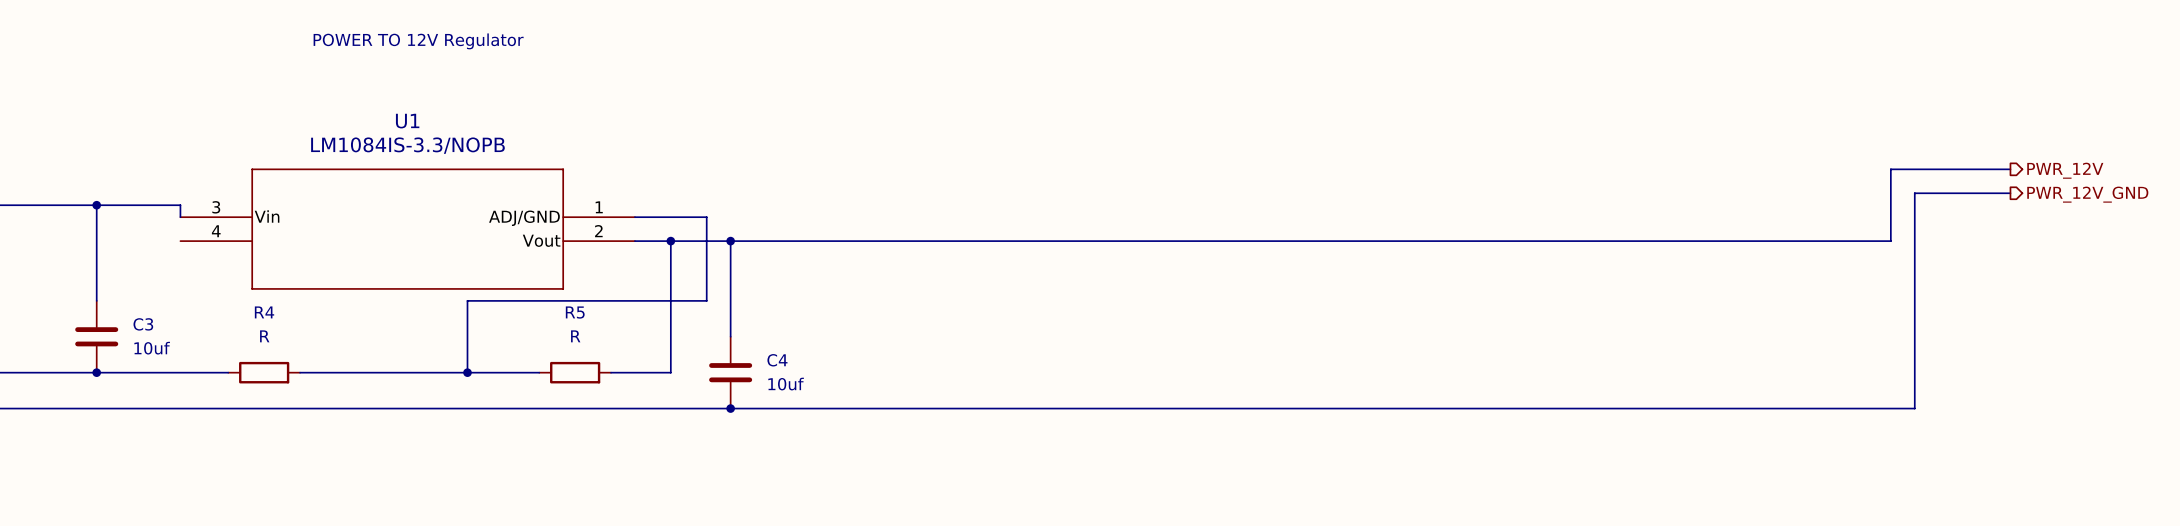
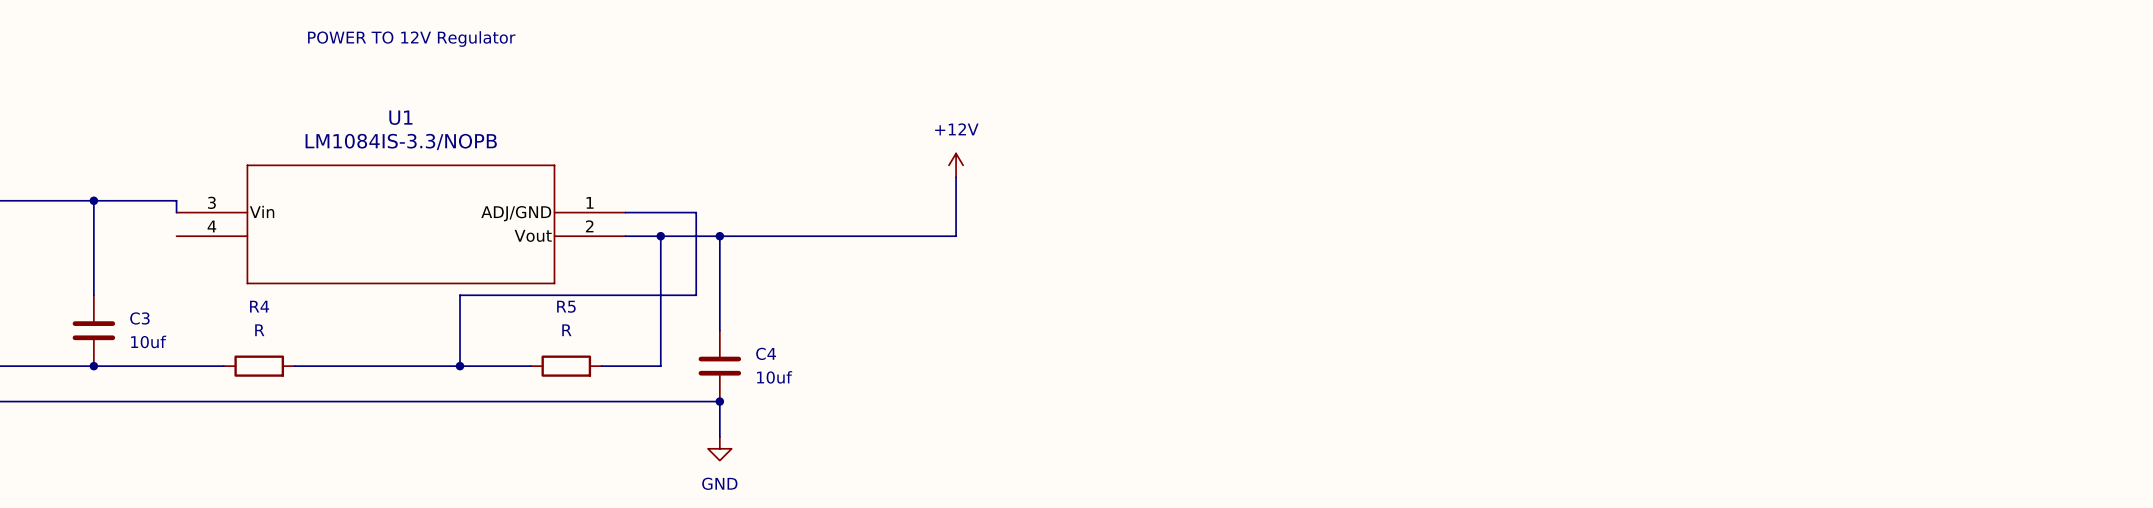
power symbol: none -> +12V (956, 165)
wire: (2010, 169) (1890, 169) (1890, 241) (969, 241) -> (956, 177) (956, 236)
hierarchical label: PWR_12V (2065, 170) -> none
wire: (2010, 193) (1914, 193) (1914, 408) (730, 408) -> (719, 436) (719, 401)
hierarchical label: PWR_12V_GND (2087, 194) -> none
power symbol: none -> GND (719, 448)

